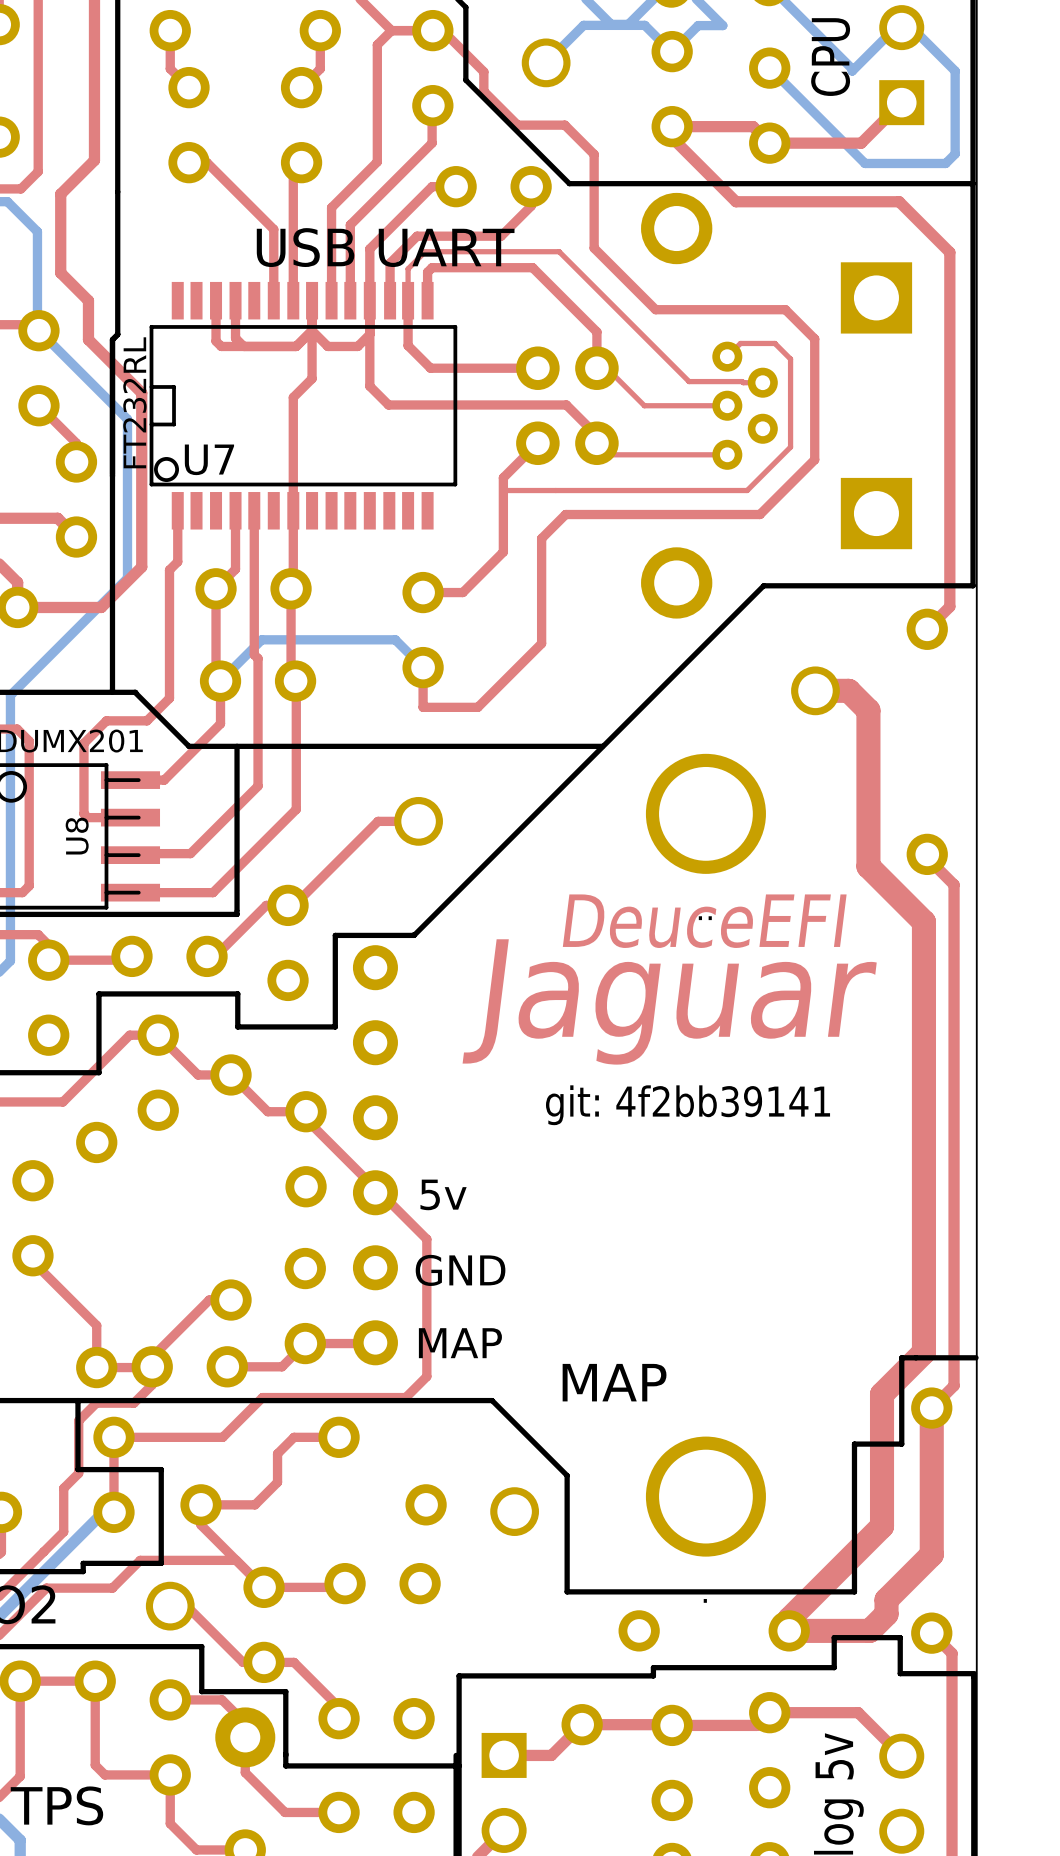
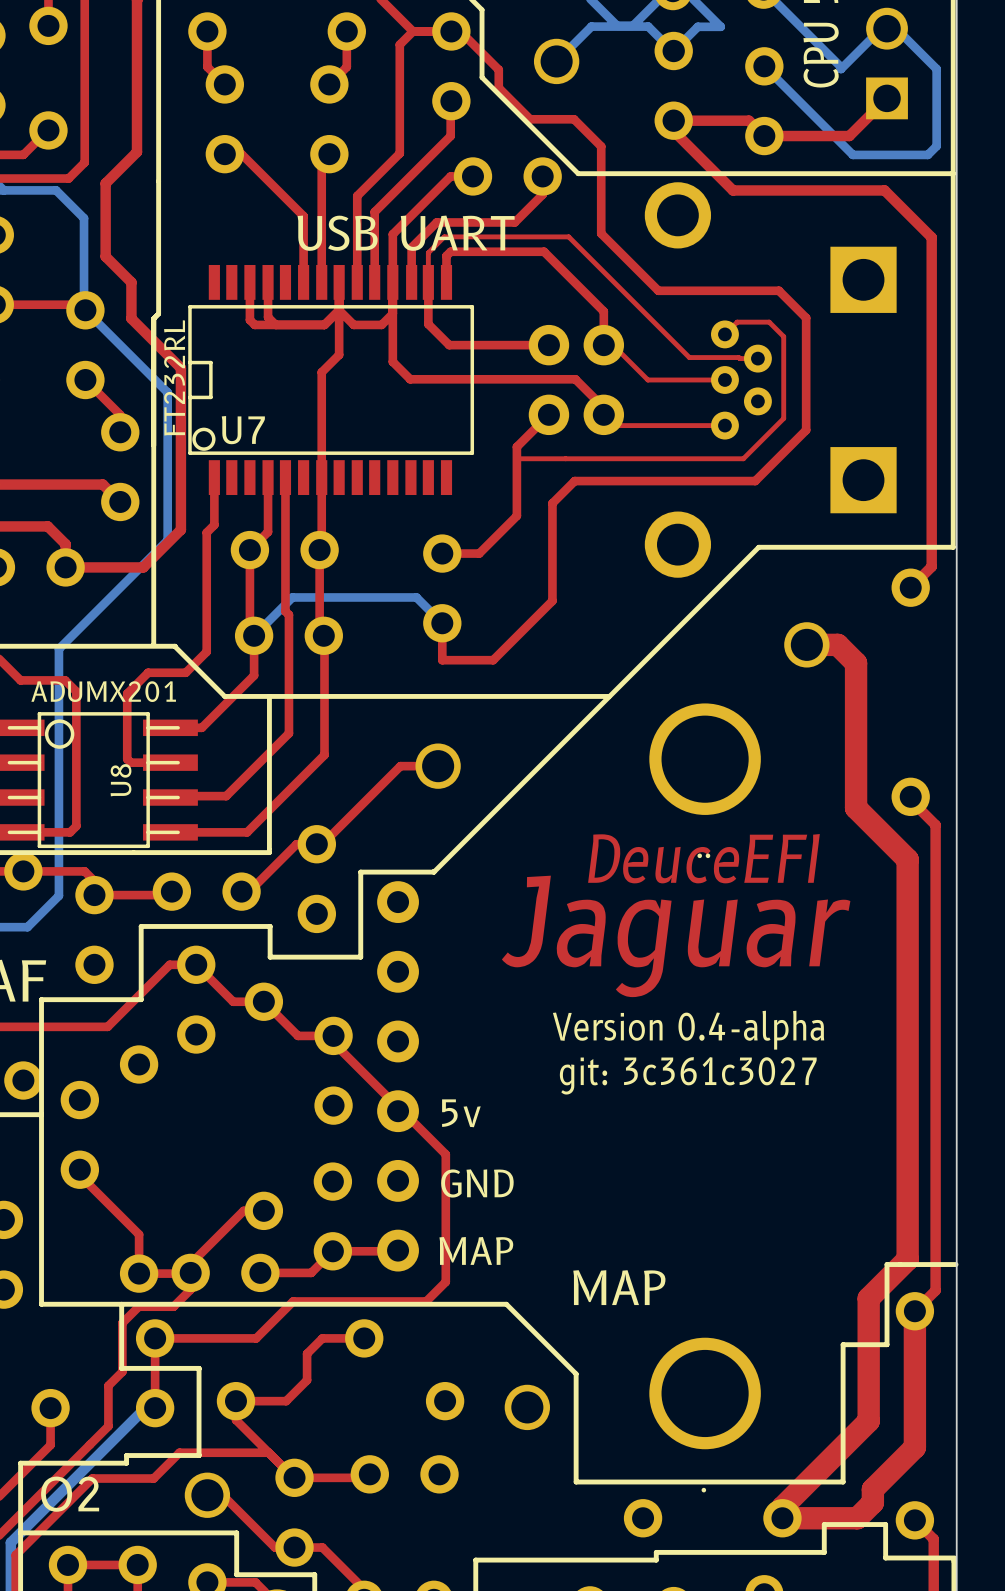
text: git: 4f2bb39141 (688, 1105) -> Version 0.4-alpha (688, 1030)
text: none -> git: 3c361c3027 (688, 1075)

